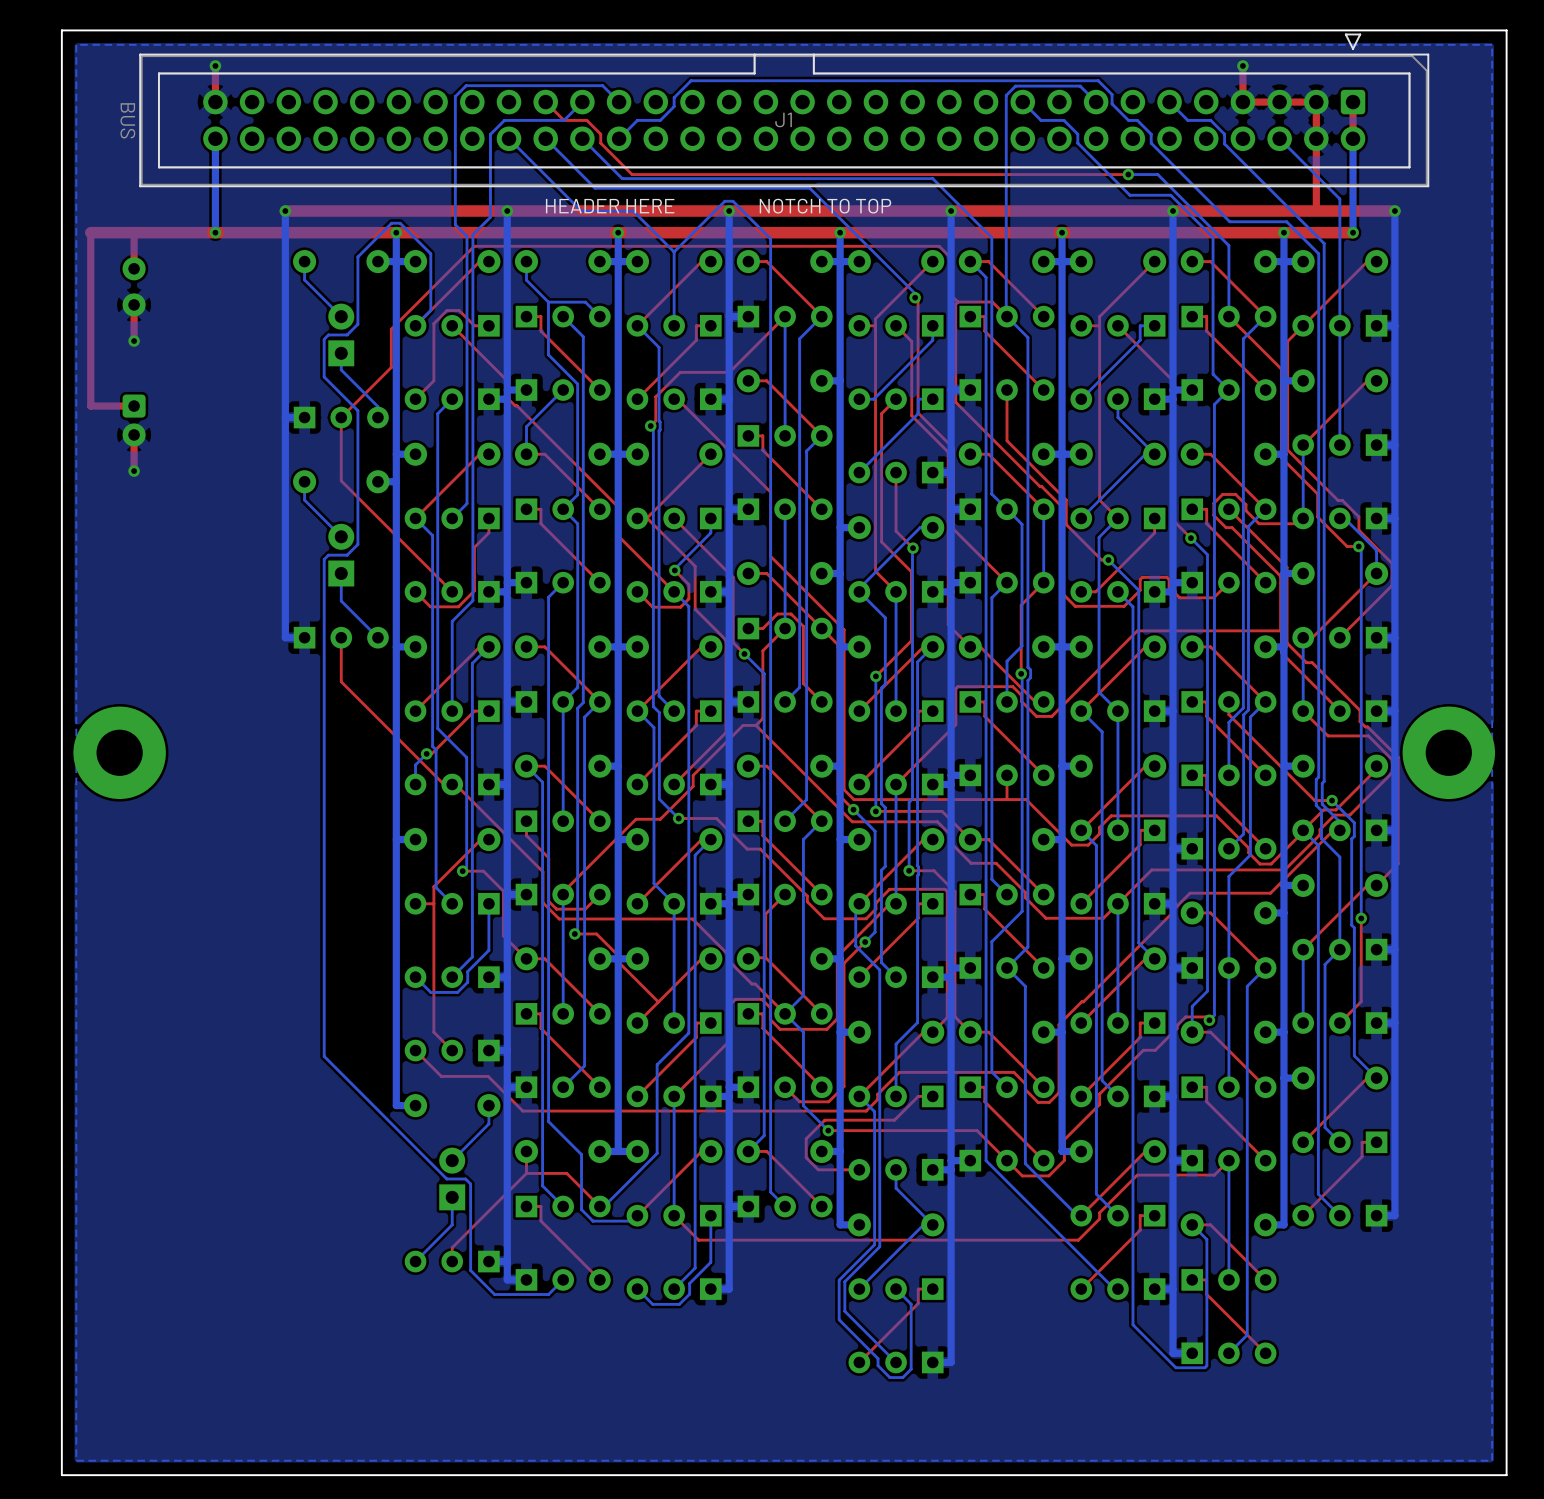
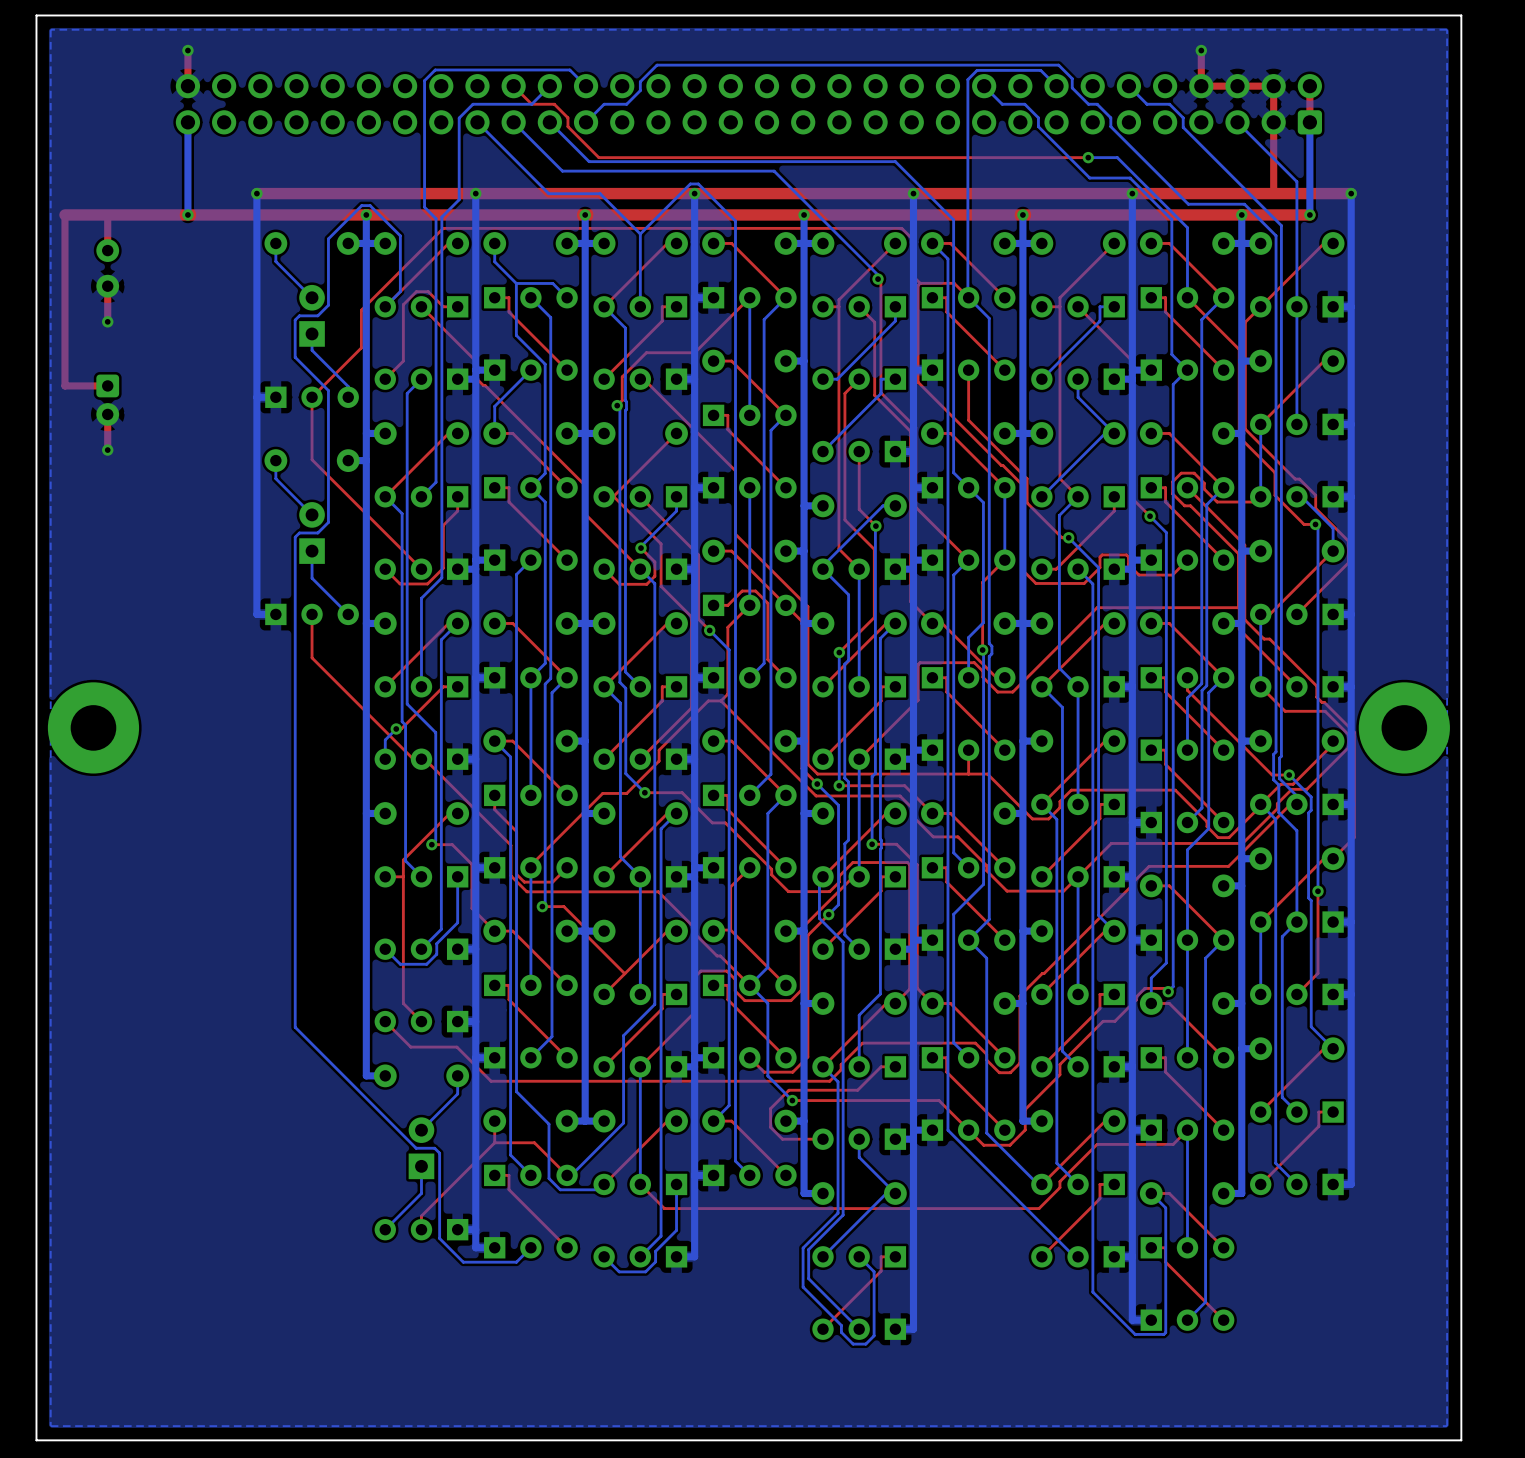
J1 side: bottom (784, 110) -> top (748, 104)
text: HEADER HERE (610, 206) -> none
text: NOTCH TO TOP (825, 206) -> none

